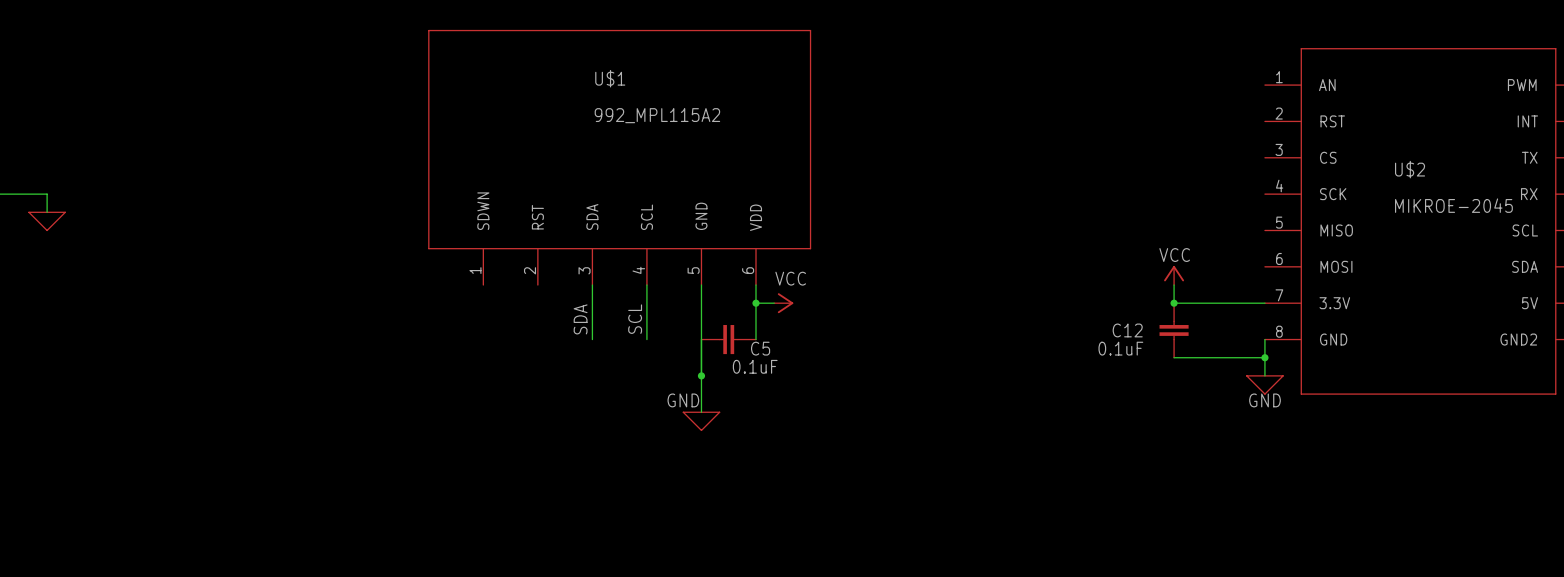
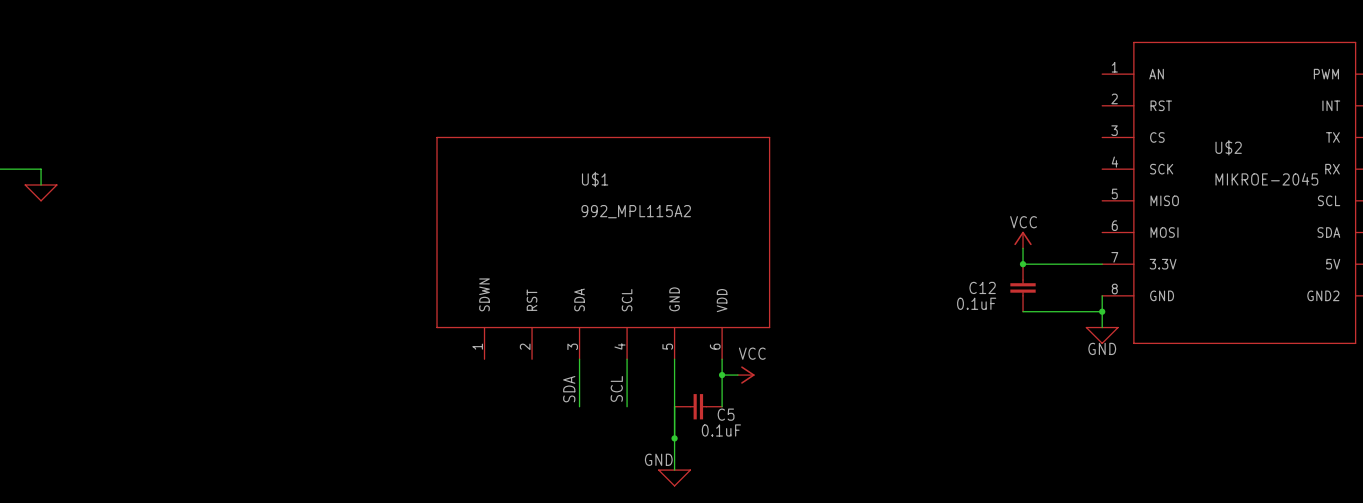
U$1 position: (619, 157) -> (603, 248)
wire: (592, 285) (592, 339) -> (579, 359) (579, 406)
wire: (646, 285) (646, 339) -> (627, 359) (627, 406)
wire: (701, 285) (701, 412) -> (674, 359) (674, 470)
wire: (756, 285) (756, 339) -> (722, 359) (722, 406)
wire: (756, 303) (774, 303) -> (722, 375) (737, 375)
junction: (756, 303) -> none
power symbol position: VCC (783, 303) -> VCC (746, 375)
label position: SDA (580, 319) -> SDA (569, 389)
label position: SCL (635, 319) -> SCL (616, 388)
C5 position: (728, 339) -> (698, 406)
junction: (701, 375) -> none
label position: GND (683, 400) -> GND (658, 459)
power symbol position: (701, 421) -> (674, 478)
junction: none -> (722, 375)
junction: none -> (674, 438)

